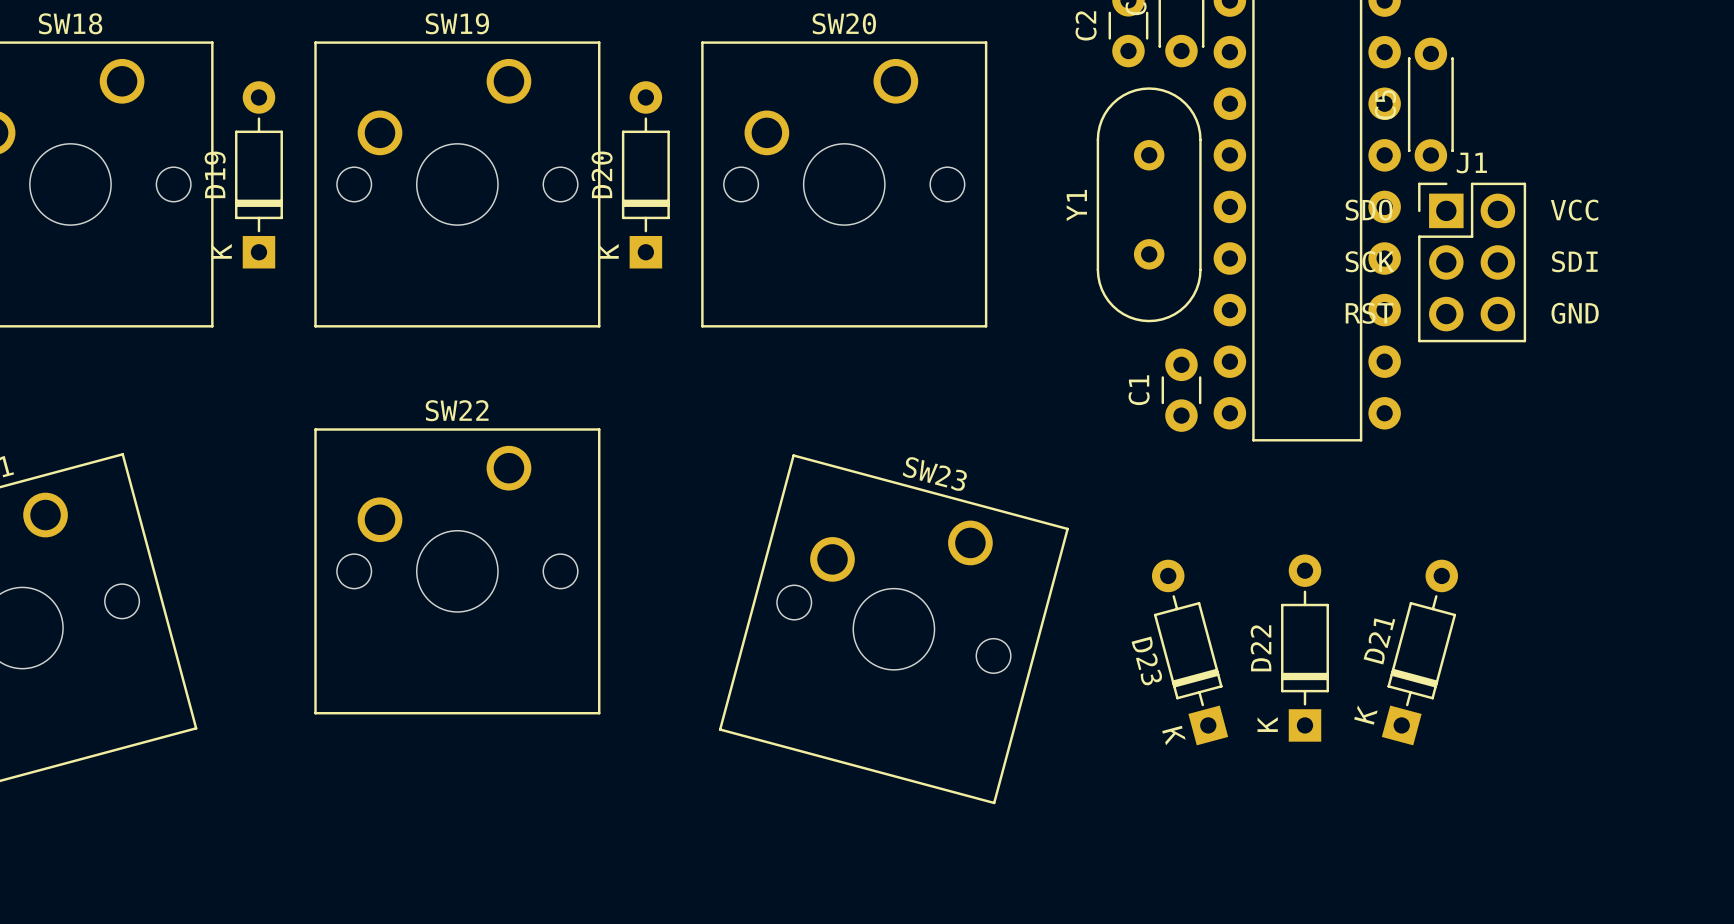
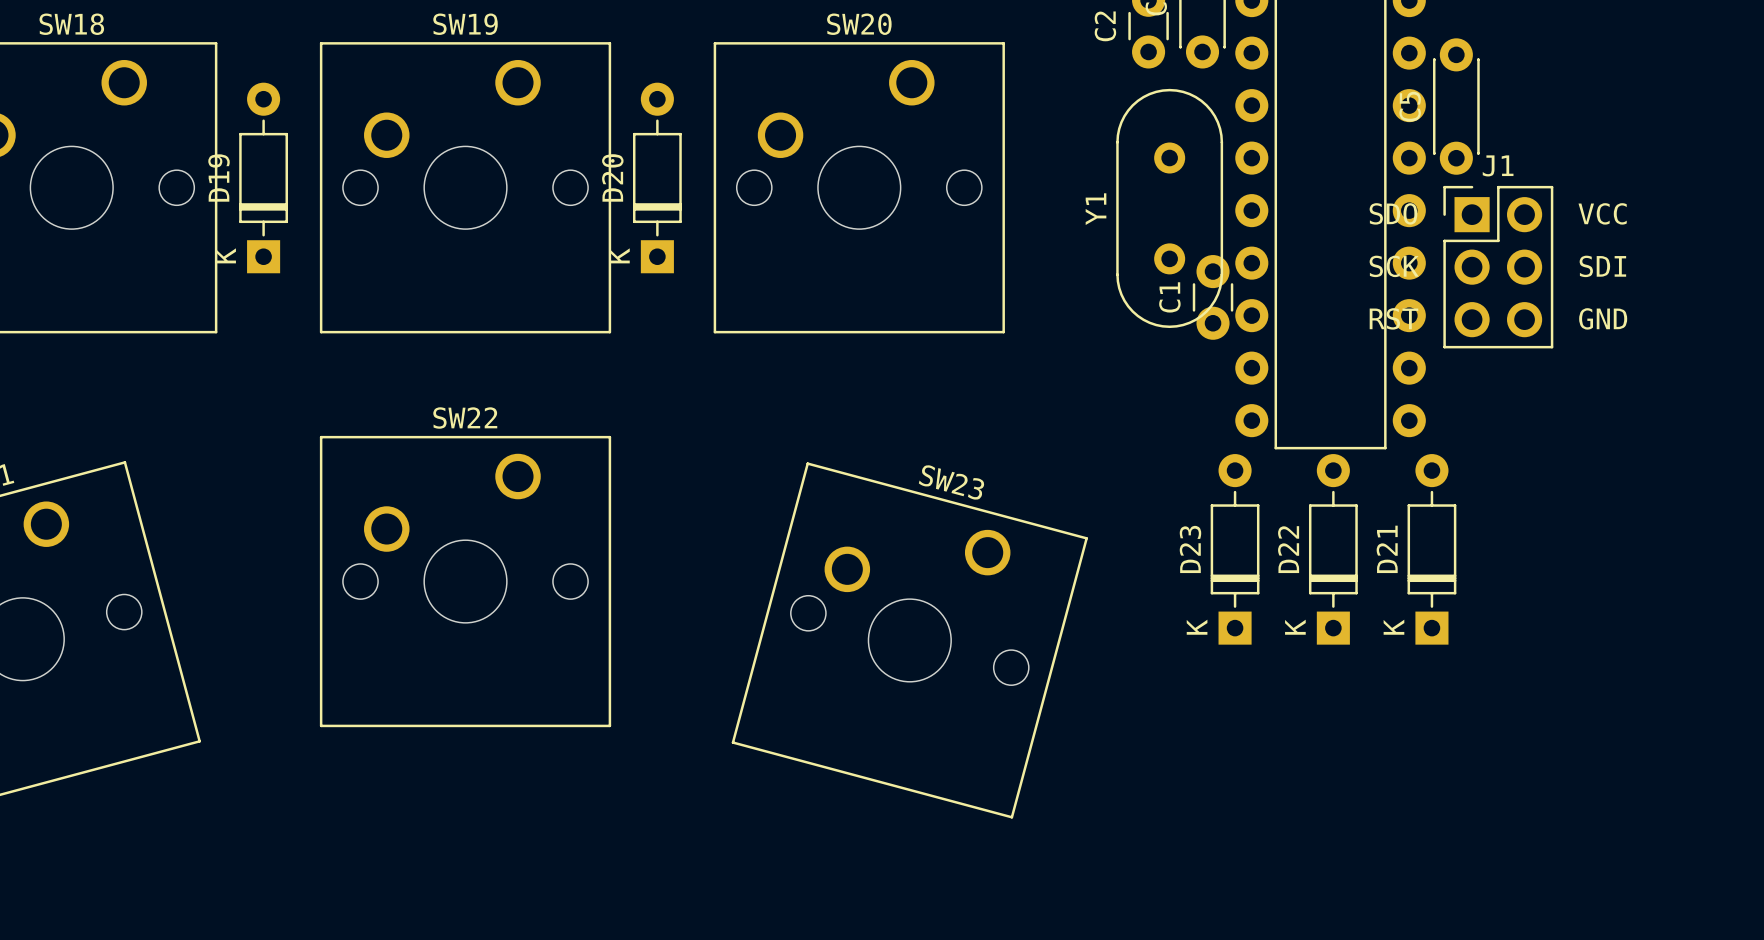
C1 position: (1181, 390) -> (1213, 297)
D22 position: (1304, 648) -> (1333, 549)
D23 rotation: 0° (1190, 652) -> 15° clockwise (1235, 549)
D23 position: (1190, 652) -> (1235, 549)
D21 rotation: 0° (1419, 652) -> 15° counterclockwise (1431, 549)
D21 position: (1419, 652) -> (1431, 549)

